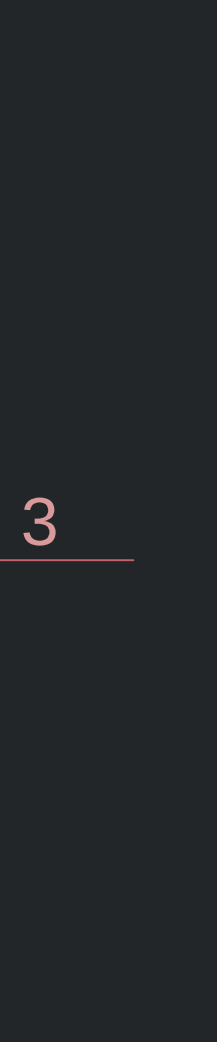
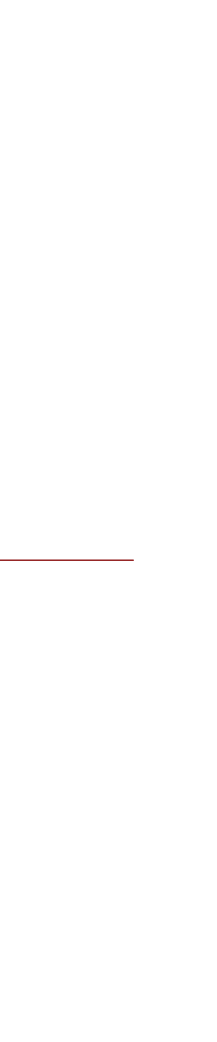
part pin number: 3 (39, 521) -> none

